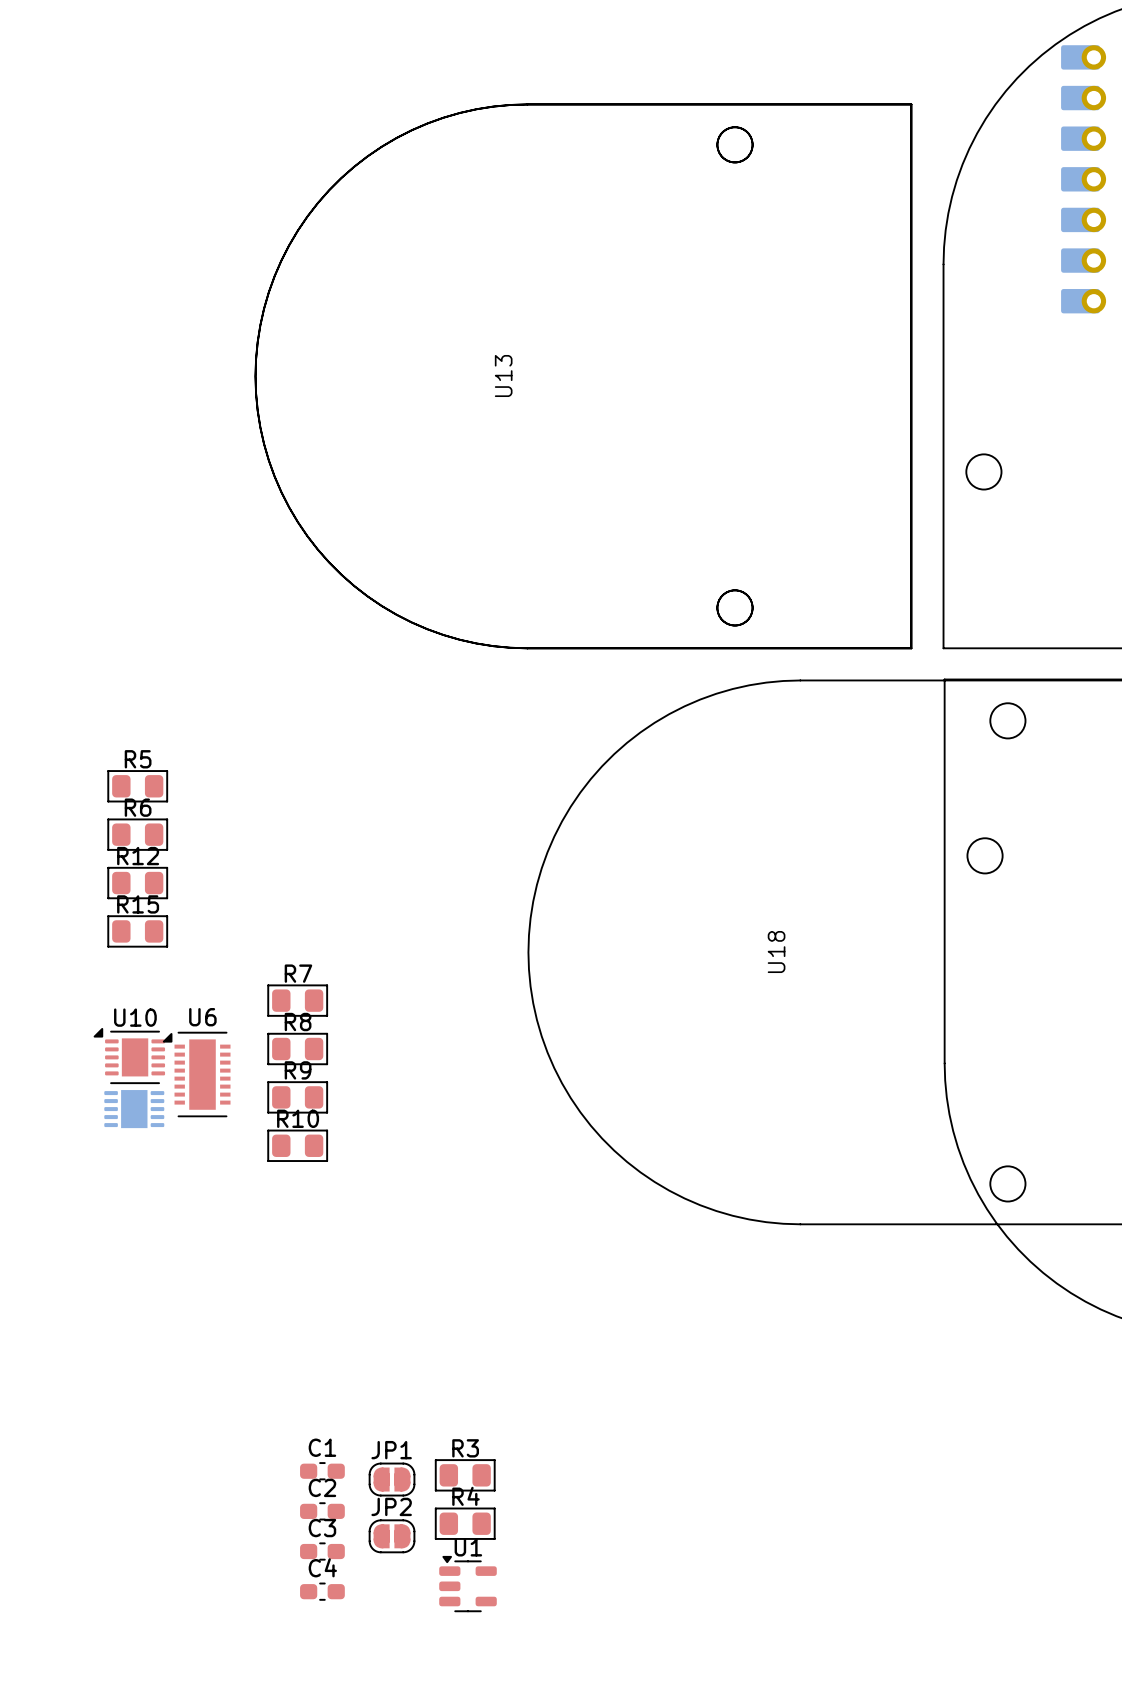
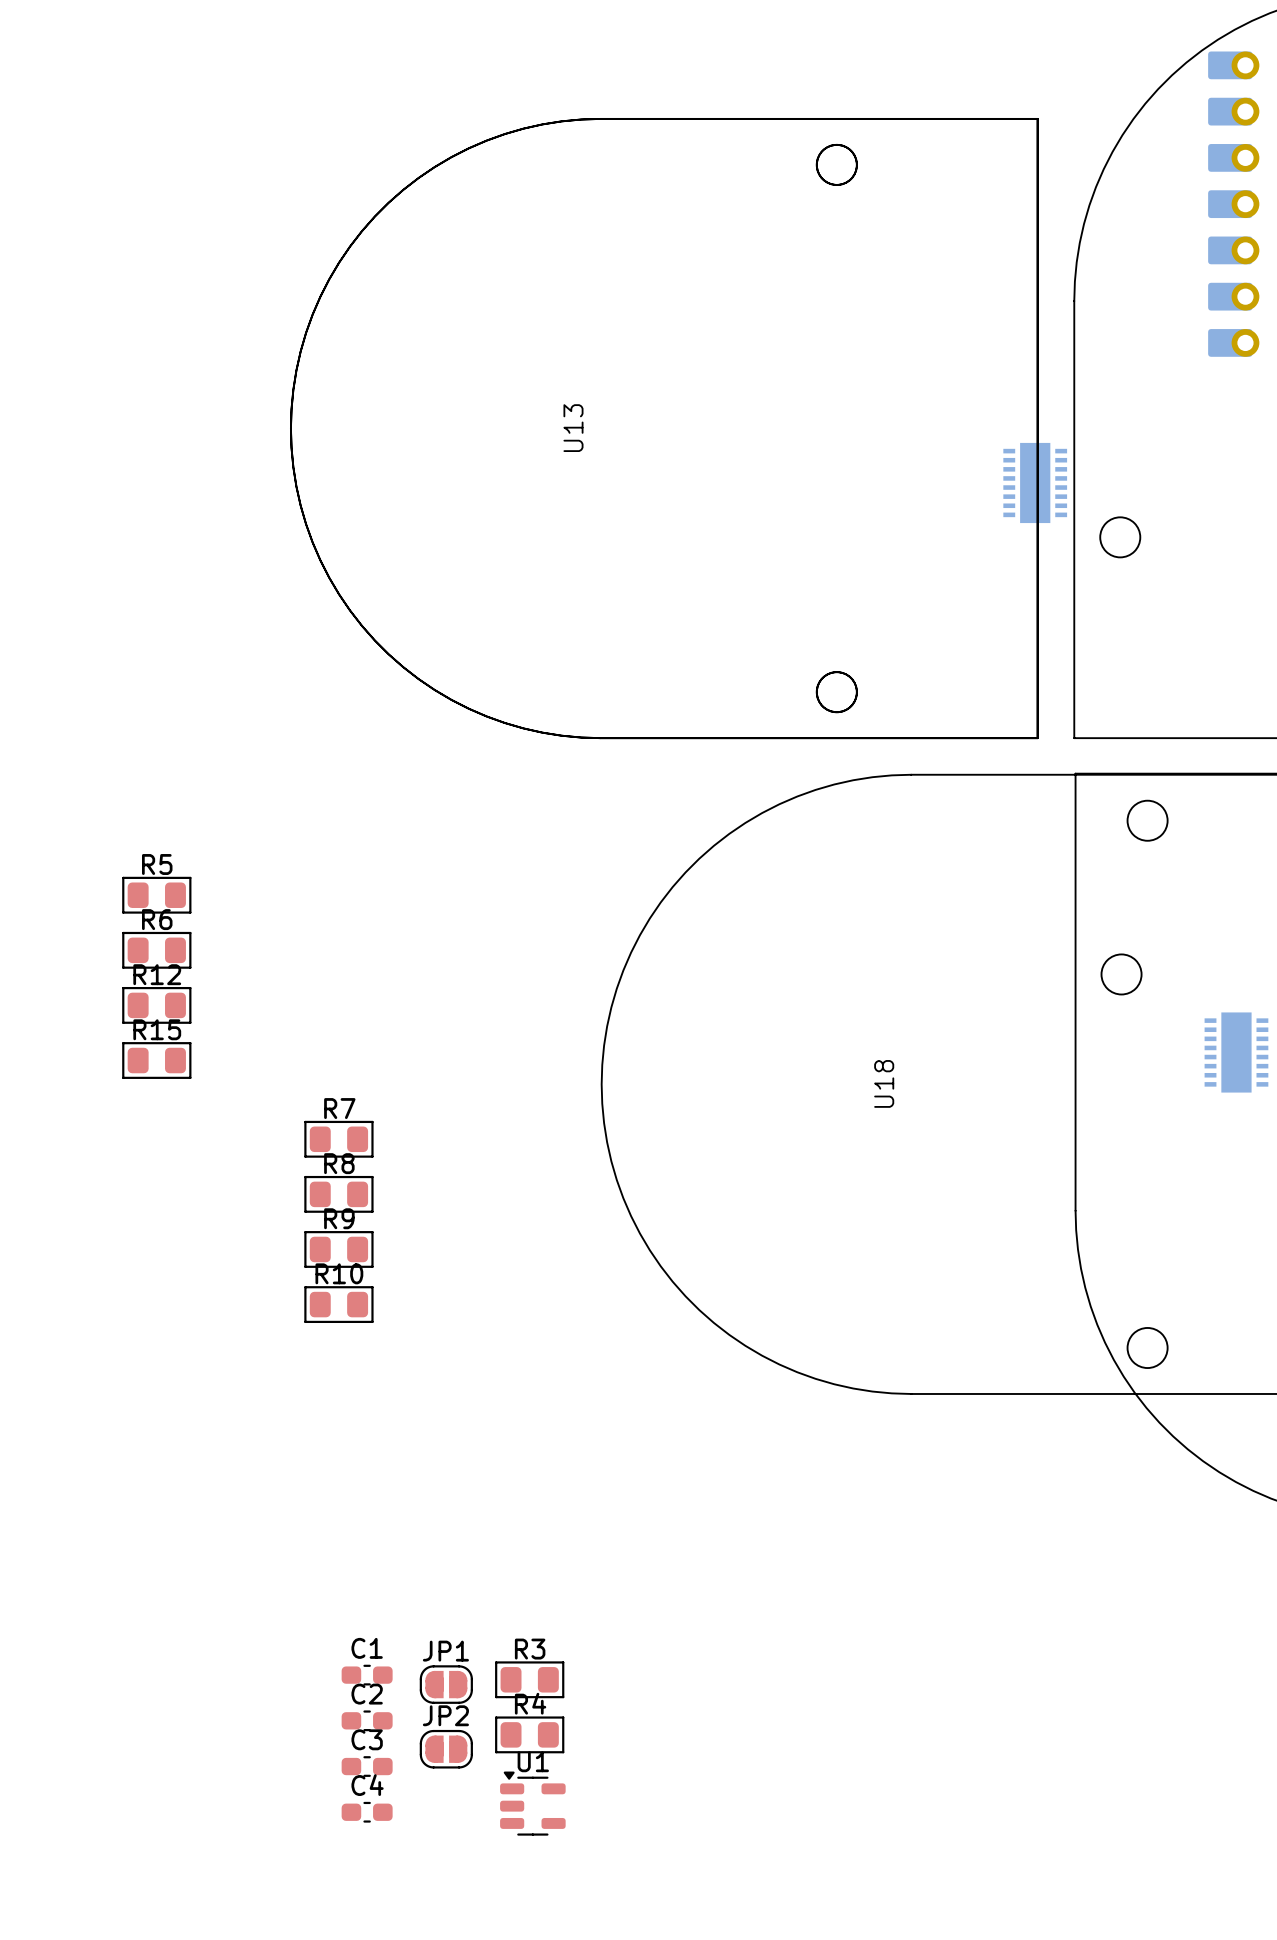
part: none -> (1035, 482)
part: none -> (1236, 1052)
U10: (129, 1056) -> none
U6: (196, 1074) -> none
part: (134, 1109) -> none

